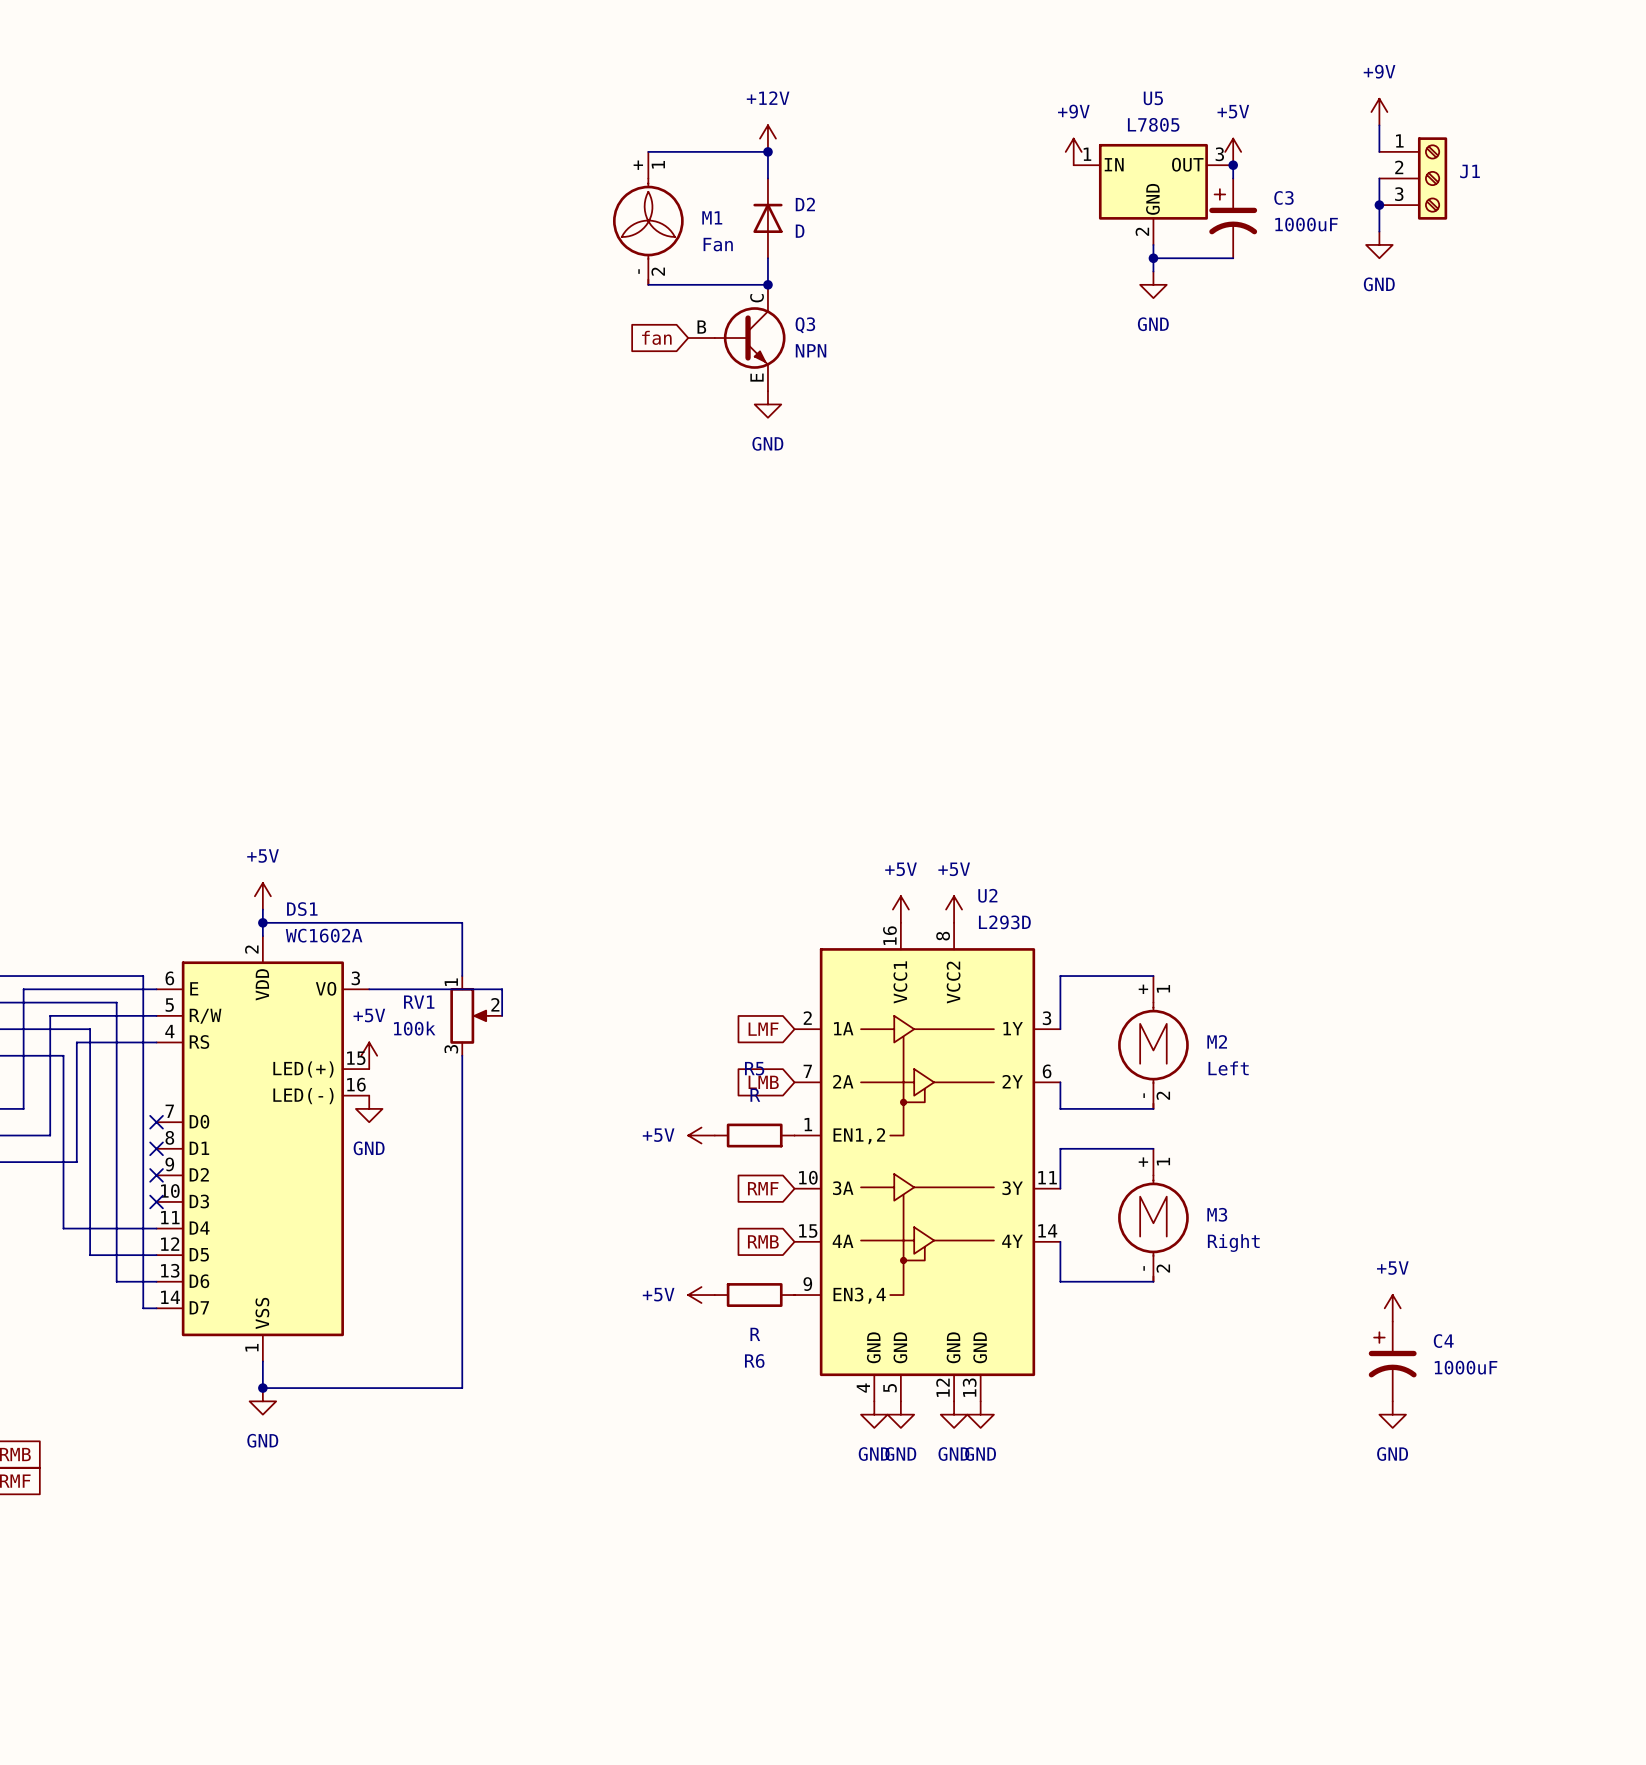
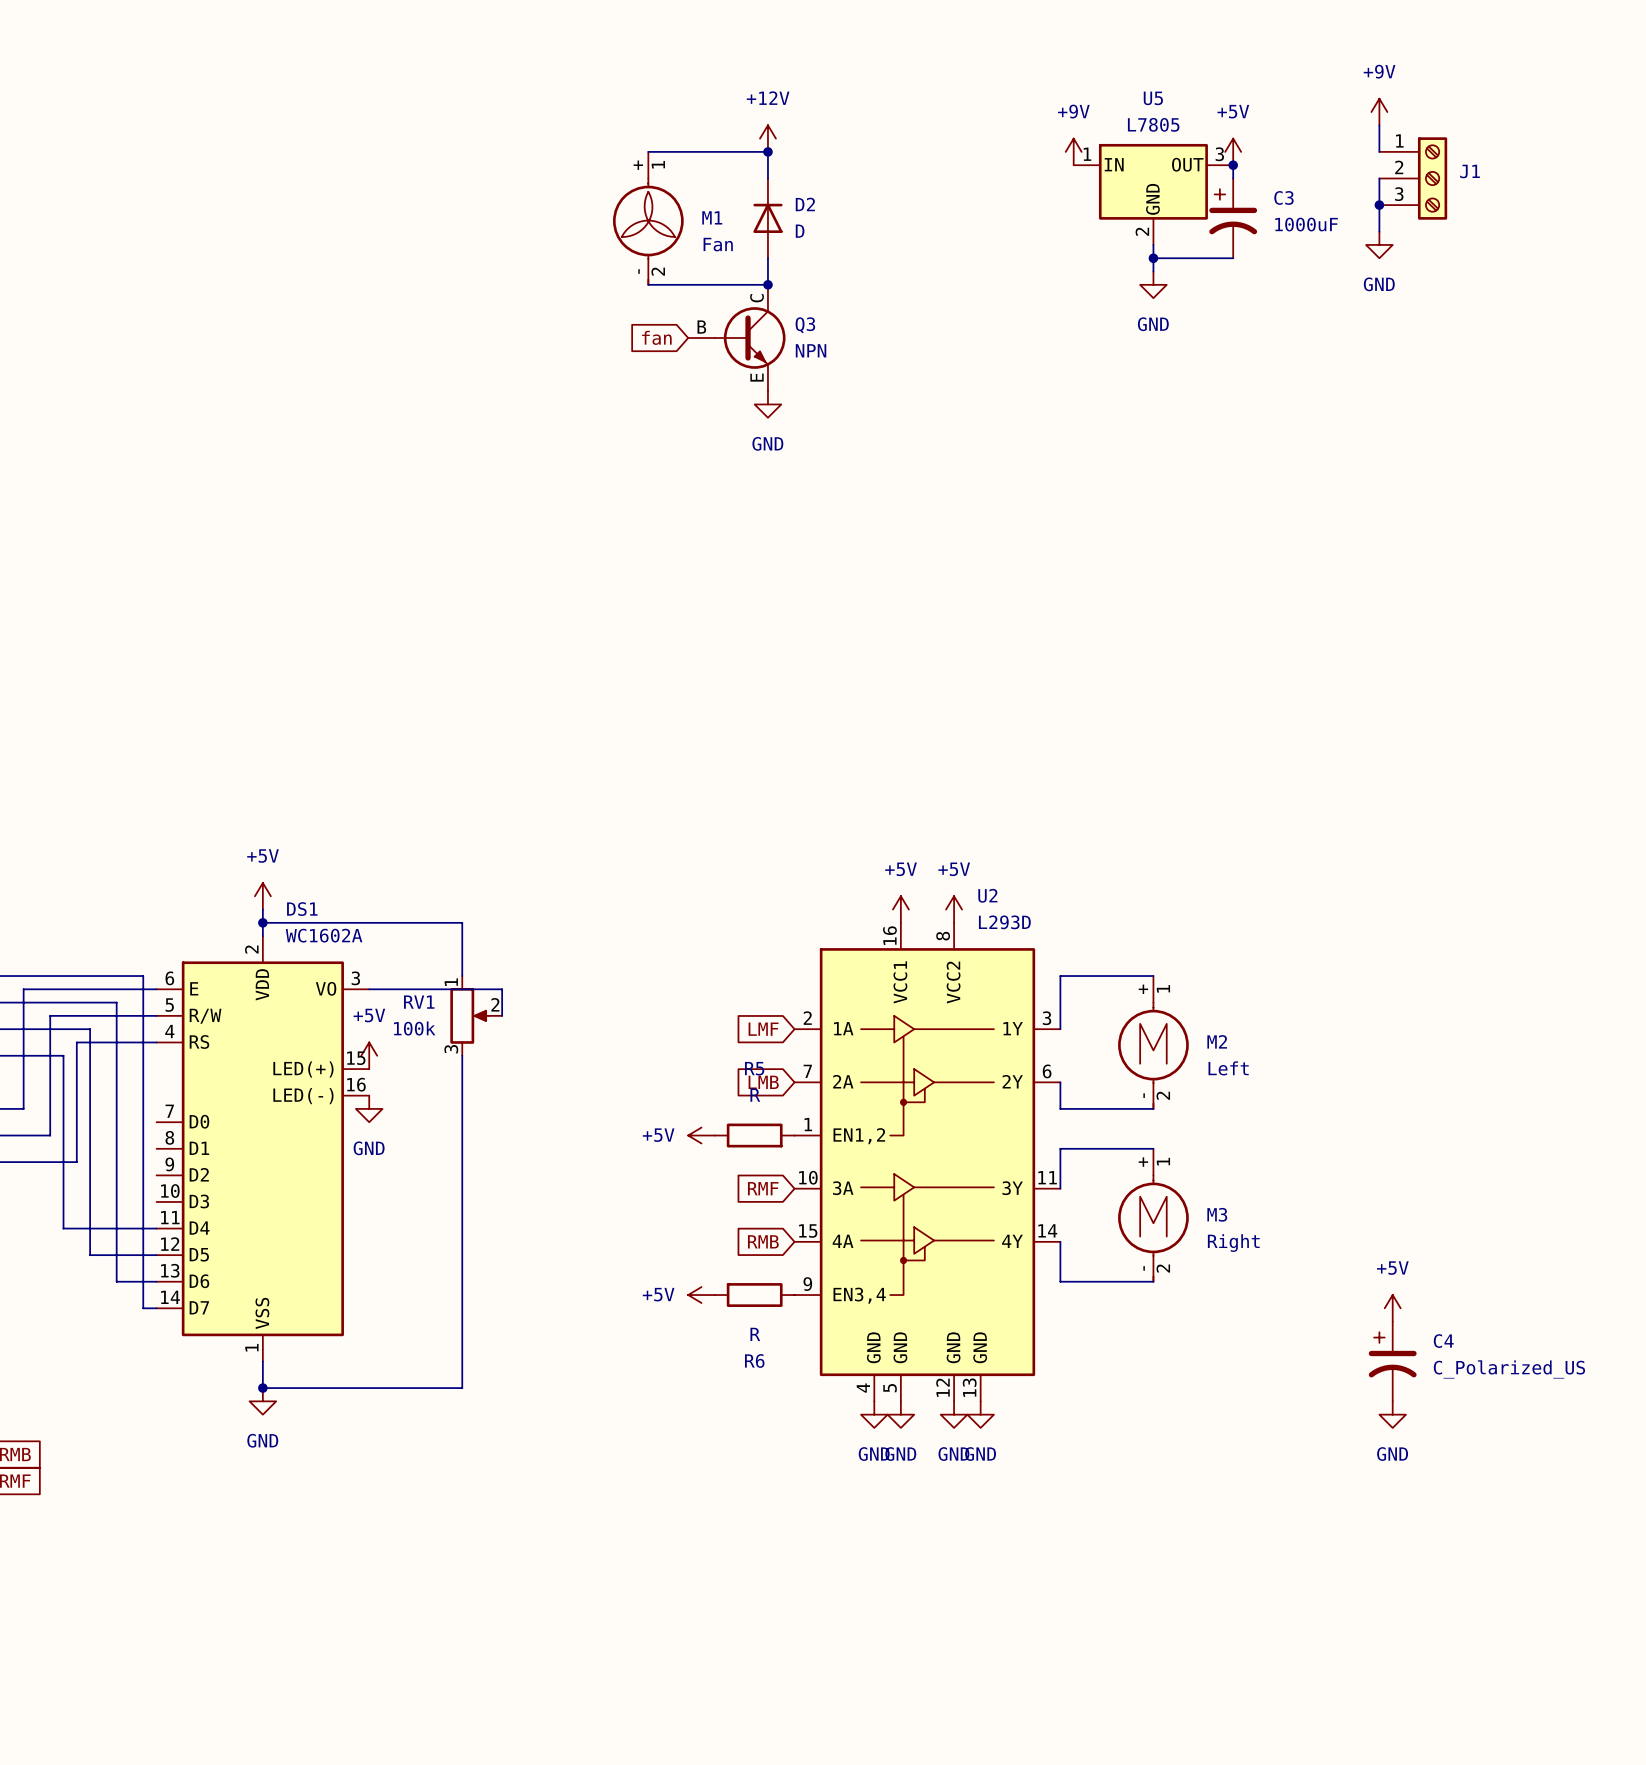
no-connect mark: (156, 1122) -> none
no-connect mark: (156, 1148) -> none
no-connect mark: (156, 1175) -> none
no-connect mark: (156, 1201) -> none
C4 value: 1000uF (1466, 1367) -> C_Polarized_US (1509, 1369)

